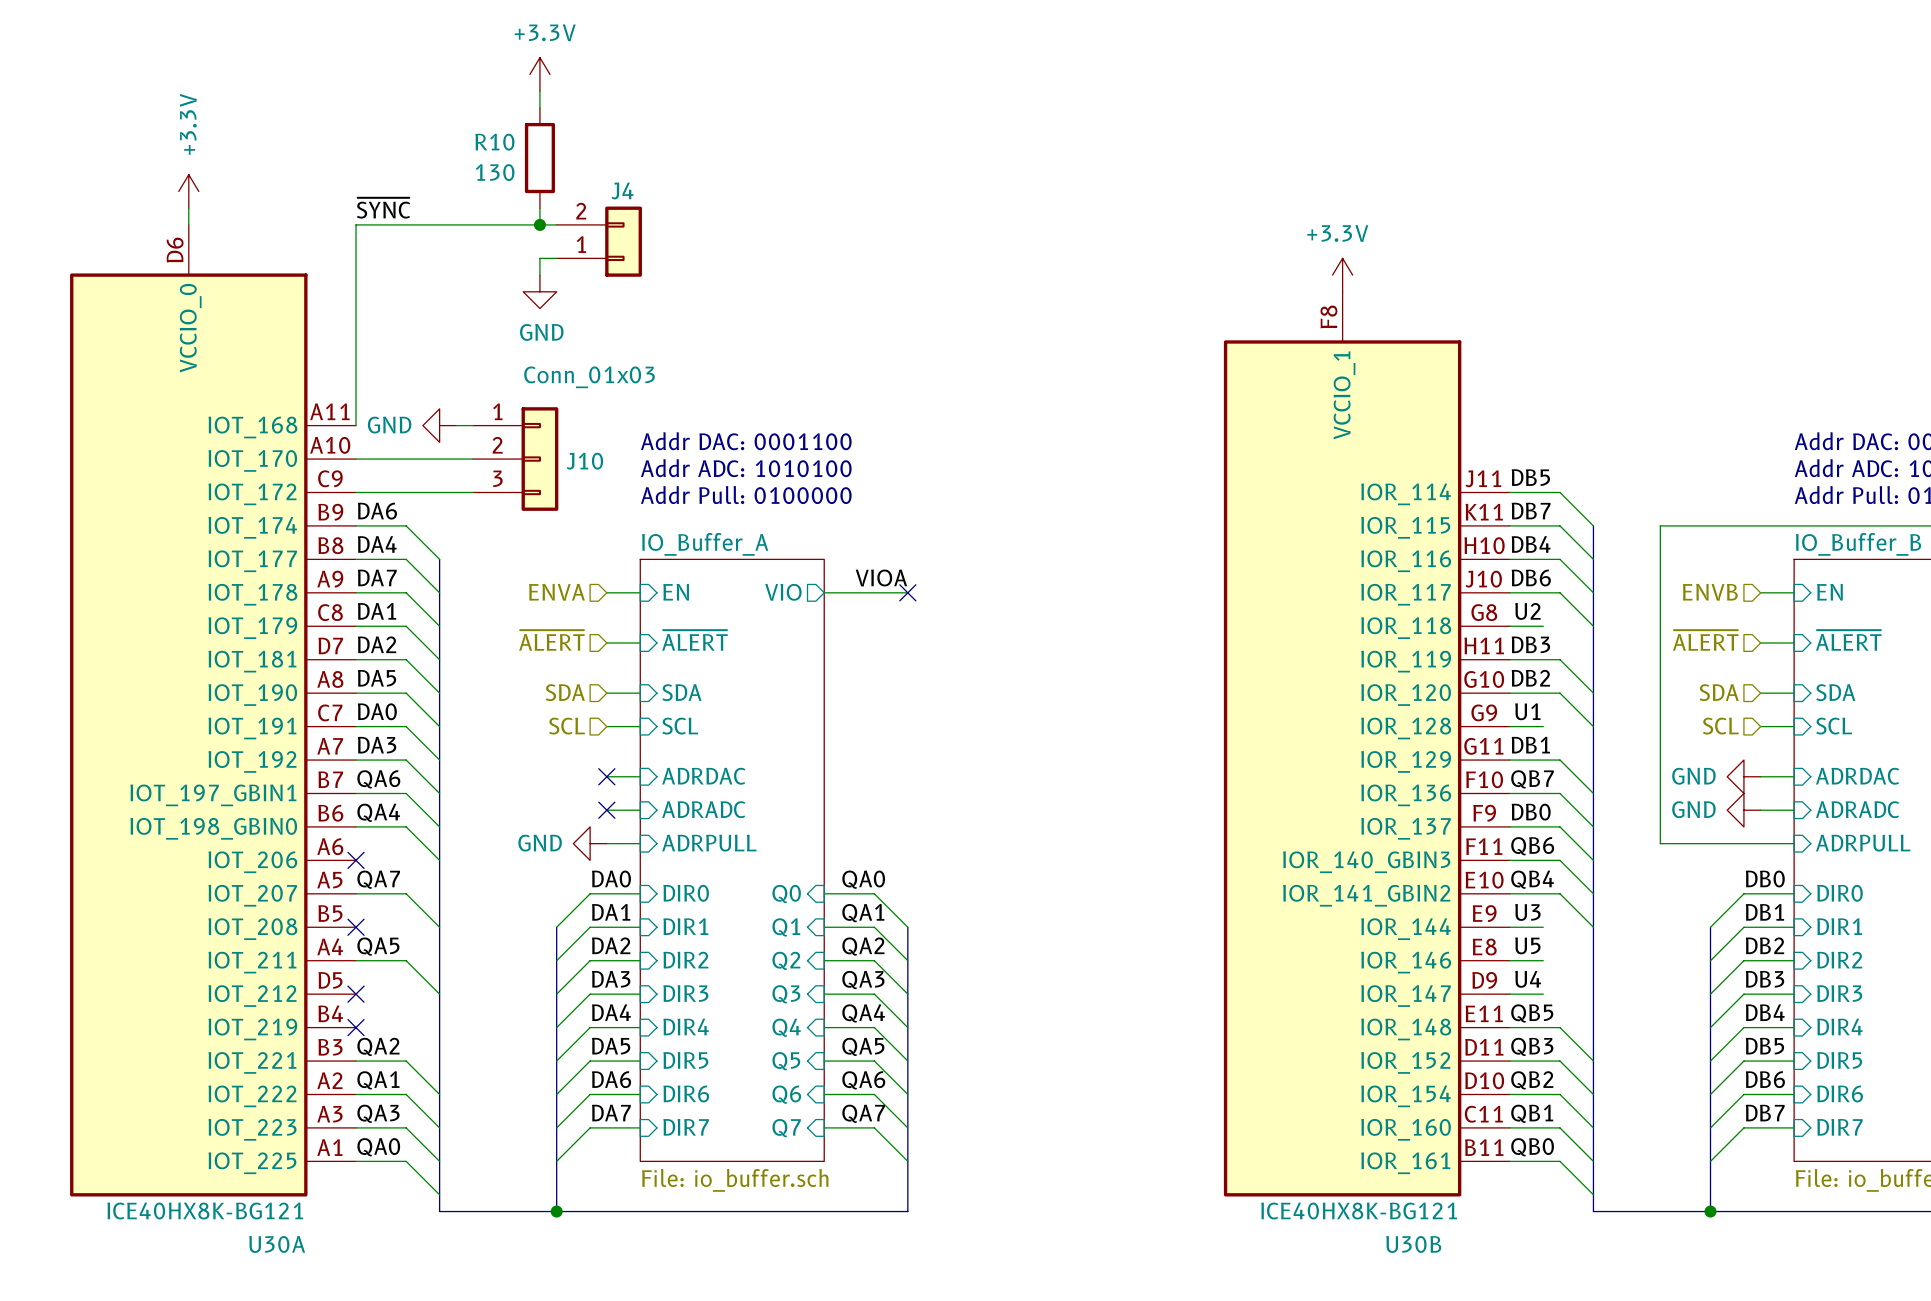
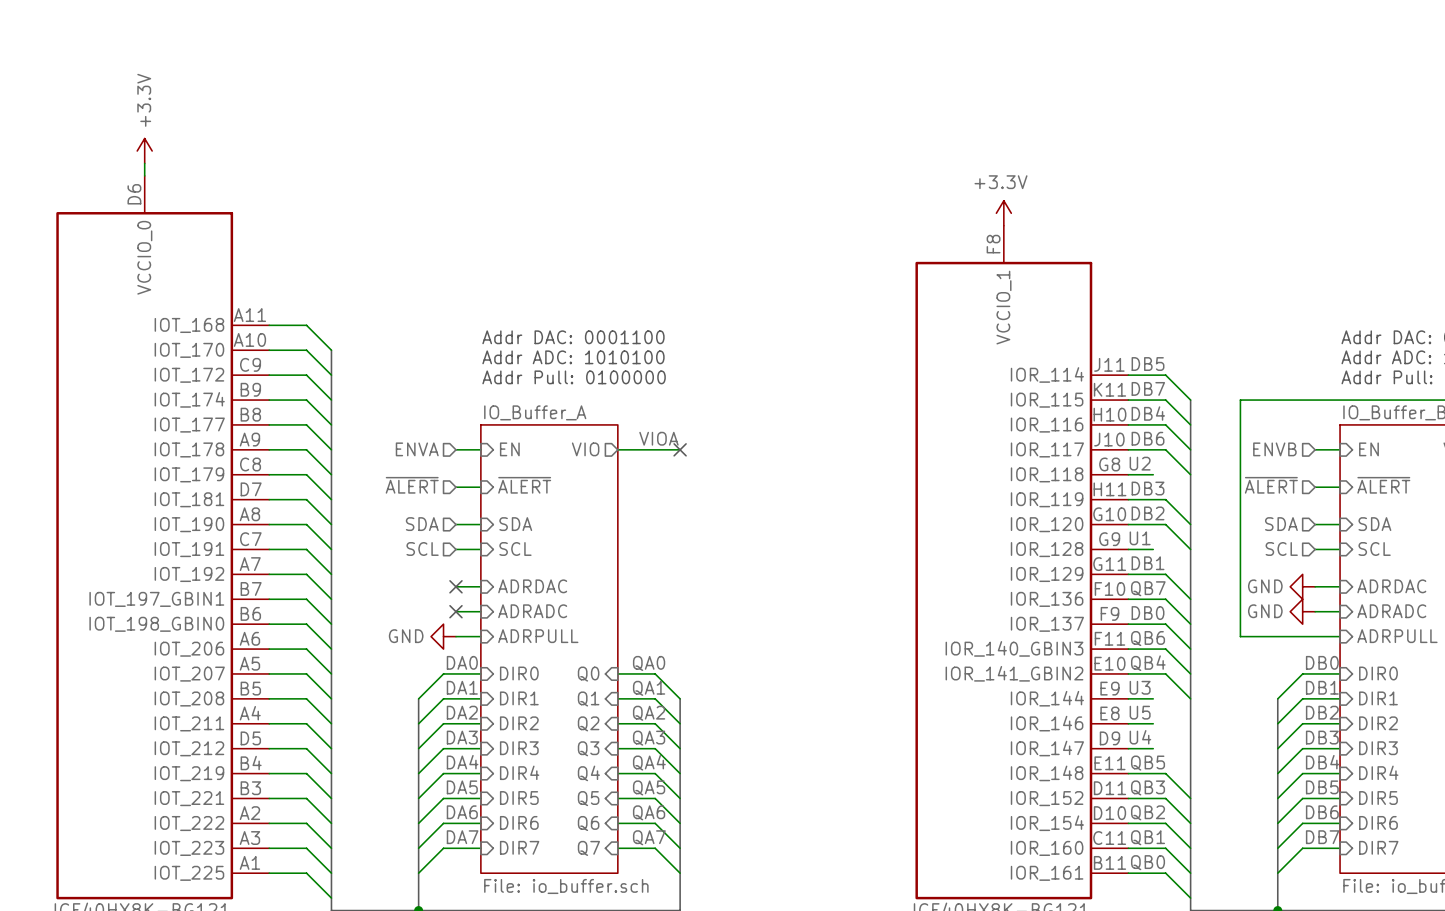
power symbol: +3.3V (539, 74) -> none
wire: (539, 91) (539, 107) -> none
R10: 130 (539, 158) -> none
label: ~{SYNC} (383, 208) -> none
wire: (539, 208) (539, 224) -> none
junction: (539, 224) -> none
wire: (556, 224) (356, 224) (356, 425) -> (331, 350) (306, 325) (269, 325)
J4: (599, 241) -> none
wire: (556, 258) (539, 258) (539, 275) -> none
power symbol: GND (539, 291) -> none
power symbol: GND (439, 425) -> none
wire: (456, 425) (473, 425) -> none
wire: (406, 459) (473, 459) -> (306, 350) (331, 375)
bus: none -> (331, 350) (331, 424)
J10: Conn_01x03 (515, 459) -> none
wire: (406, 492) (473, 492) -> (306, 375) (331, 400)
label: DA6 (377, 511) -> none
label: DA4 (377, 544) -> none
label: DA7 (377, 577) -> none
label: DA1 (377, 611) -> none
label: DA2 (377, 644) -> none
label: DA5 (377, 678) -> none
label: DA0 (377, 711) -> none
label: DA3 (377, 745) -> none
label: QA6 (378, 779) -> none
label: QA4 (378, 812) -> none
wire: none -> (269, 649) (306, 649) (331, 673)
no-connect mark: (356, 860) -> none
label: QA7 (378, 879) -> none
wire: none -> (269, 698) (306, 698) (331, 723)
no-connect mark: (356, 927) -> none
label: QA5 (378, 946) -> none
wire: none -> (269, 748) (306, 748) (331, 773)
no-connect mark: (356, 994) -> none
wire: none -> (269, 773) (306, 773) (331, 798)
no-connect mark: (356, 1027) -> none
label: QA2 (378, 1046) -> none
label: QA1 (378, 1080) -> none
label: QA3 (378, 1113) -> none
label: QA0 (378, 1147) -> none

